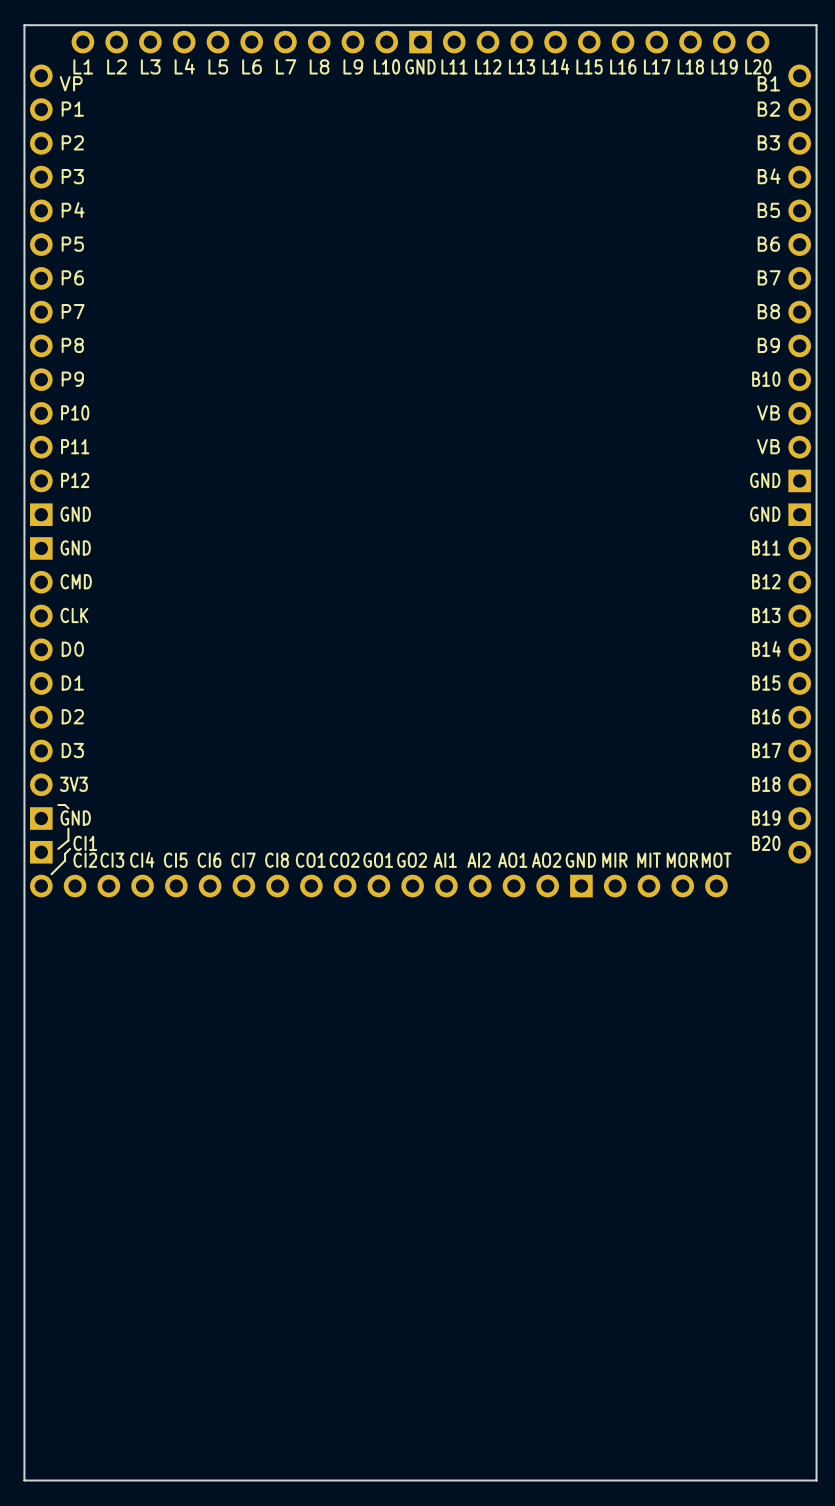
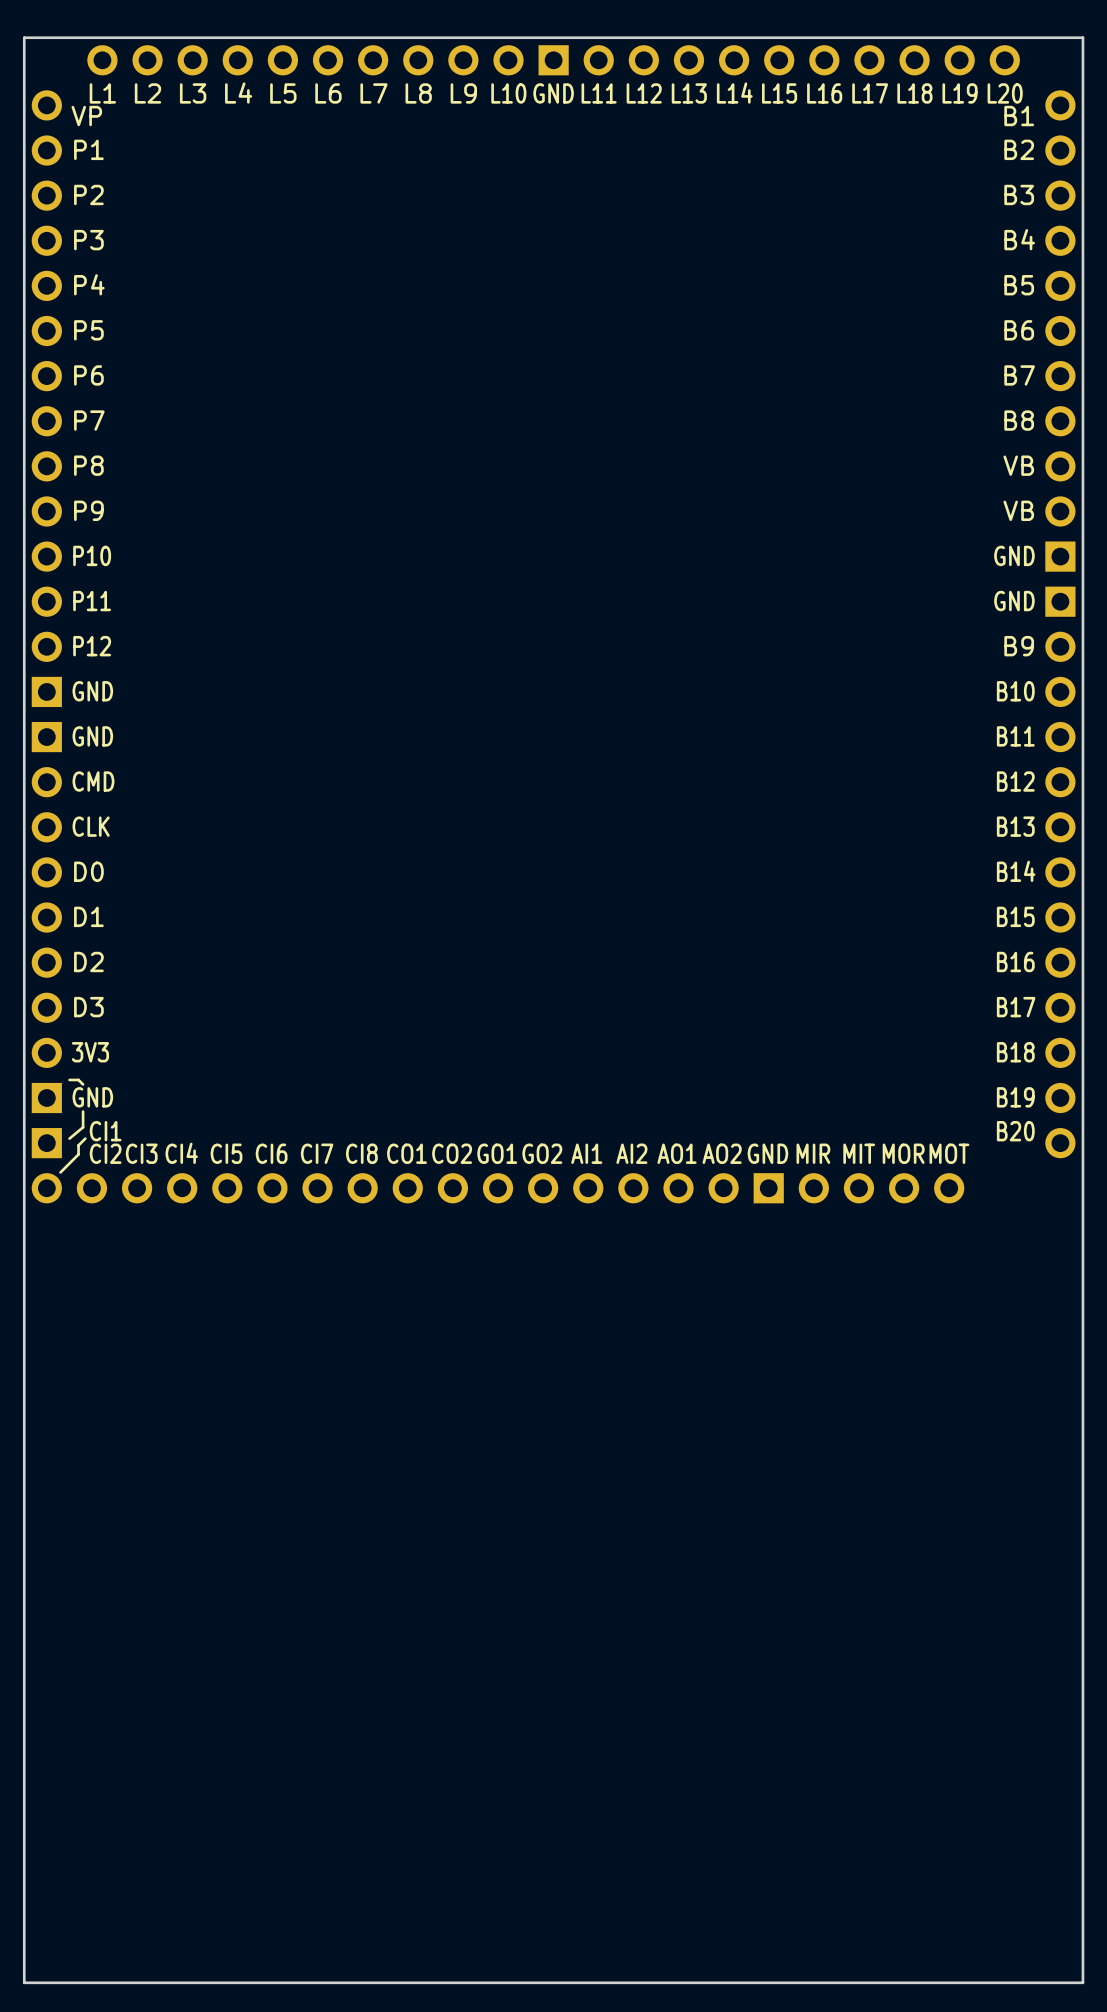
text: B9 (768, 345) -> VB (1018, 465)
text: B10 (766, 379) -> VB (1018, 510)
text: VB (768, 412) -> GND (1014, 555)
text: VB (768, 446) -> GND (1014, 601)
part rotation: 0° (799, 464) -> 180° (1060, 624)
text: GND (765, 480) -> B9 (1019, 646)
text: GND (765, 514) -> B10 (1015, 691)

